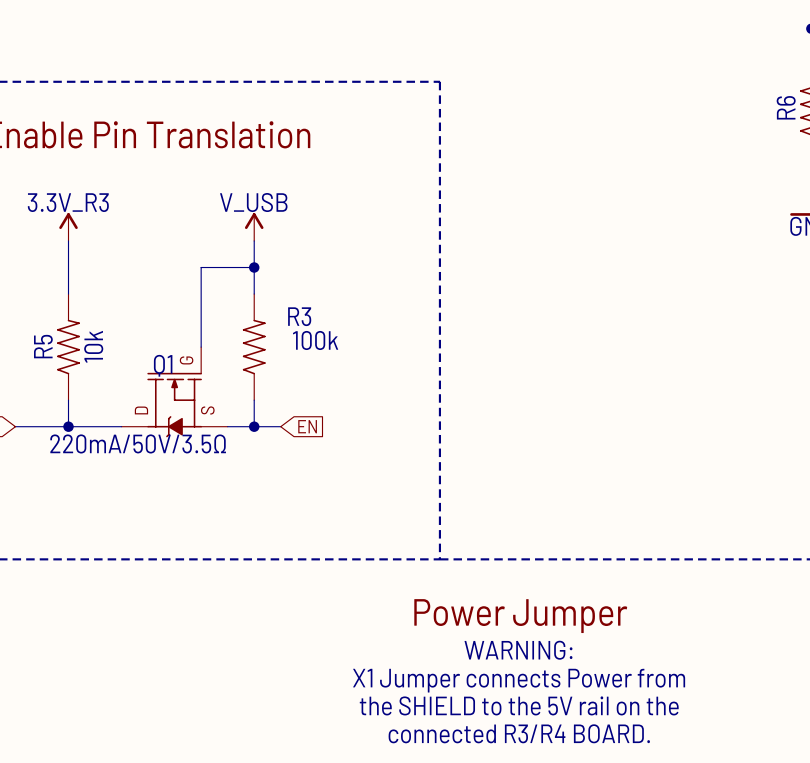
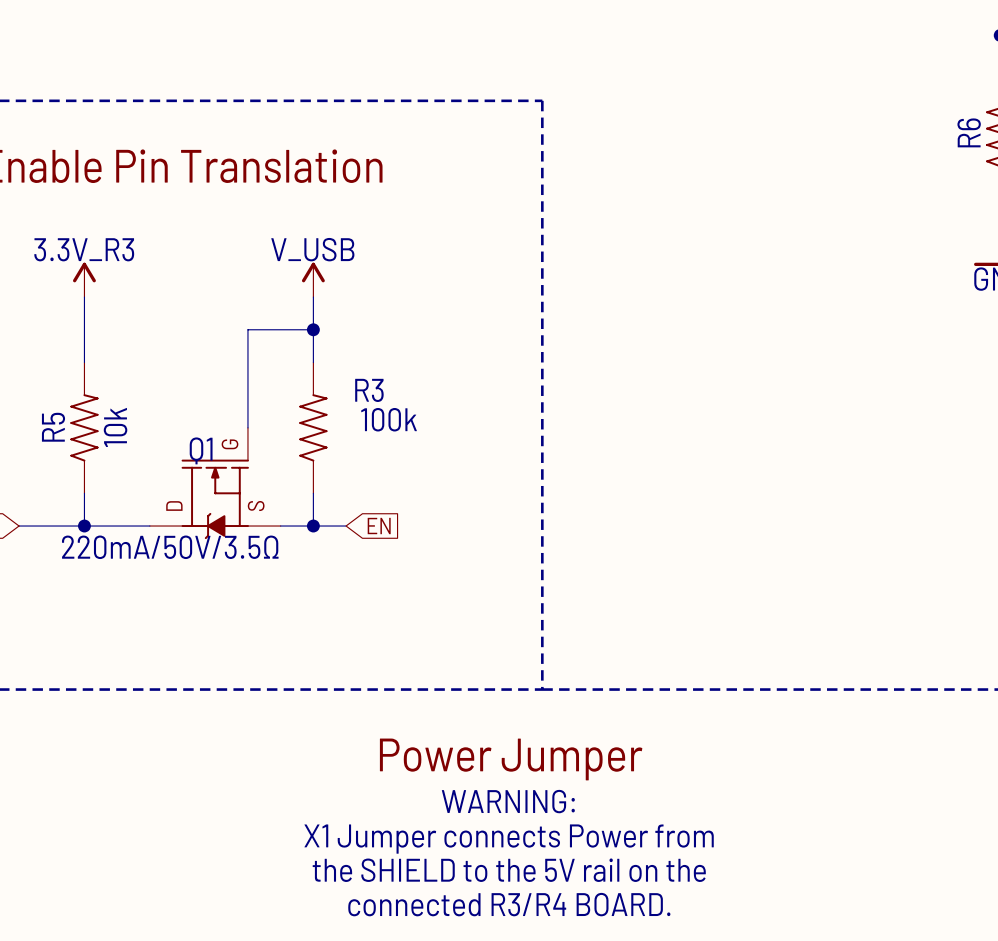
text position: Power Jumper (520, 616) -> Power Jumper (511, 759)
text position: WARNING: (518, 650) -> WARNING: (508, 801)
text position: X1 Jumper connects Power from (519, 680) -> X1 Jumper connects Power from (509, 839)
text position: the SHIELD to the 5V rail on the (519, 705) -> the SHIELD to the 5V rail on the (509, 870)
text position: connected R3/R4 BOARD. (519, 733) -> connected R3/R4 BOARD. (509, 904)

